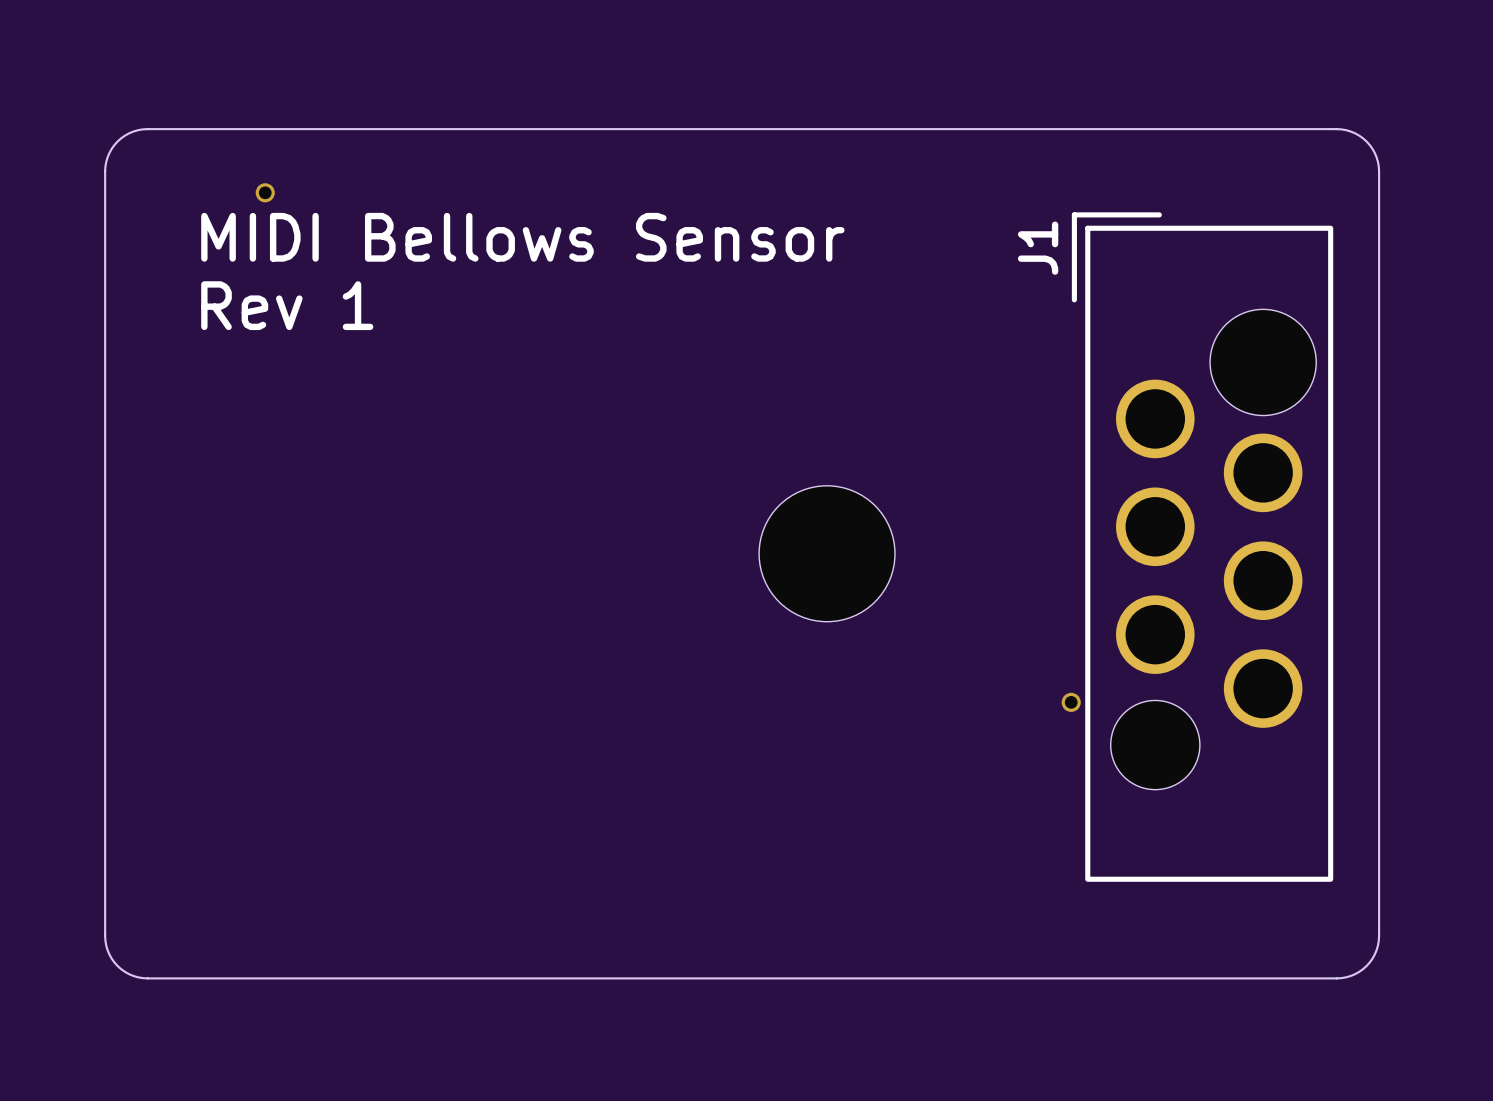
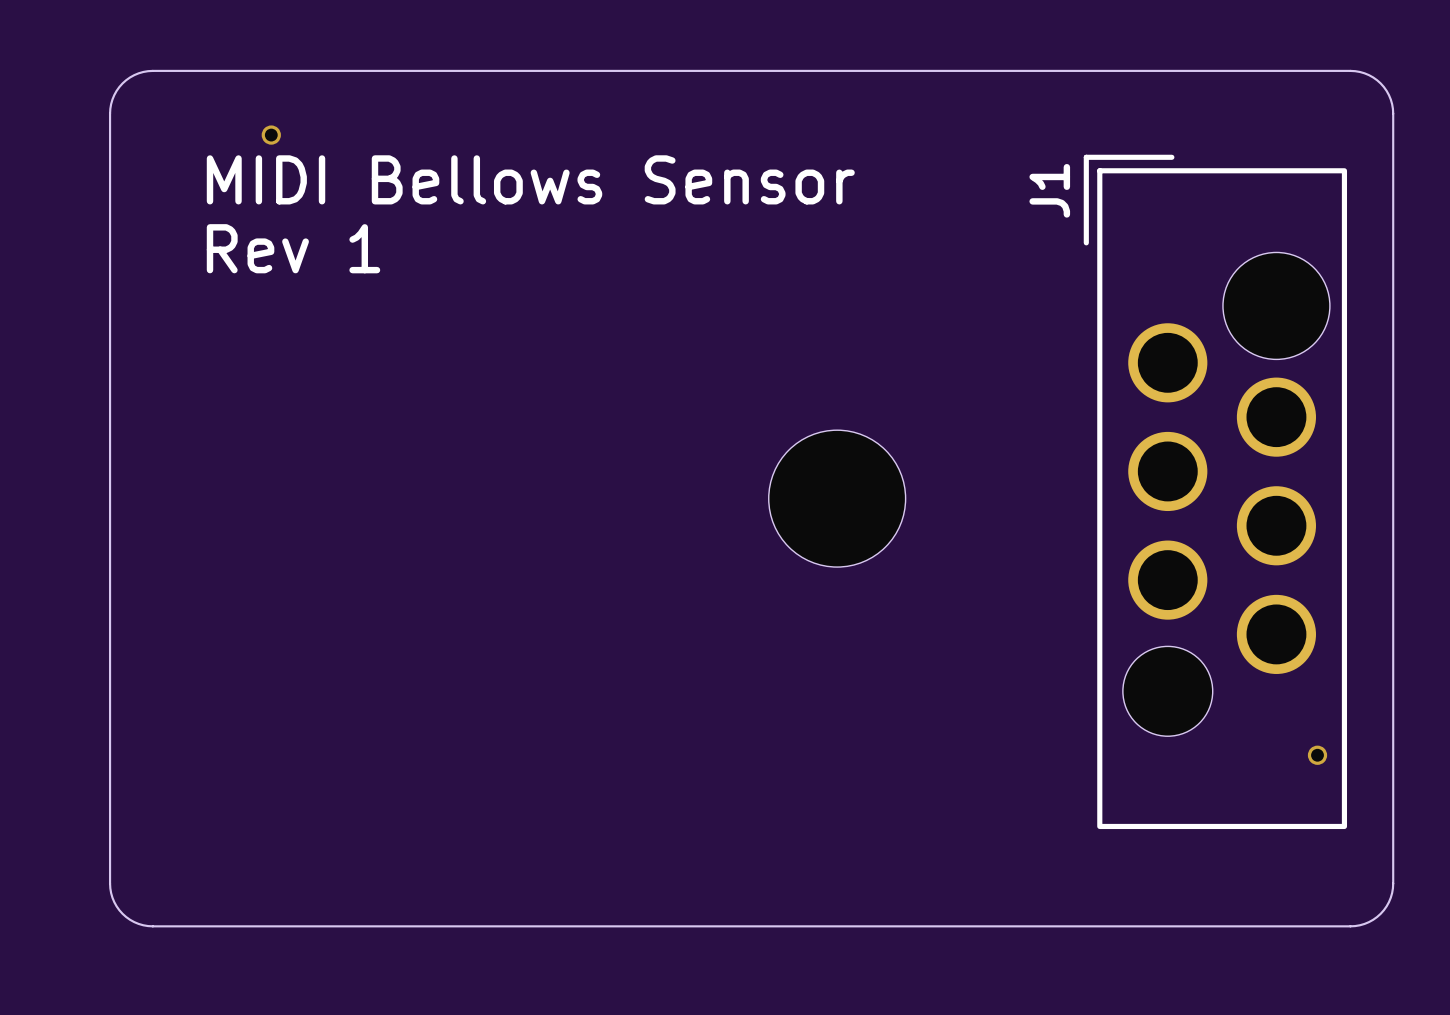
via: (1071, 702) -> none
via: none -> (1317, 755)

